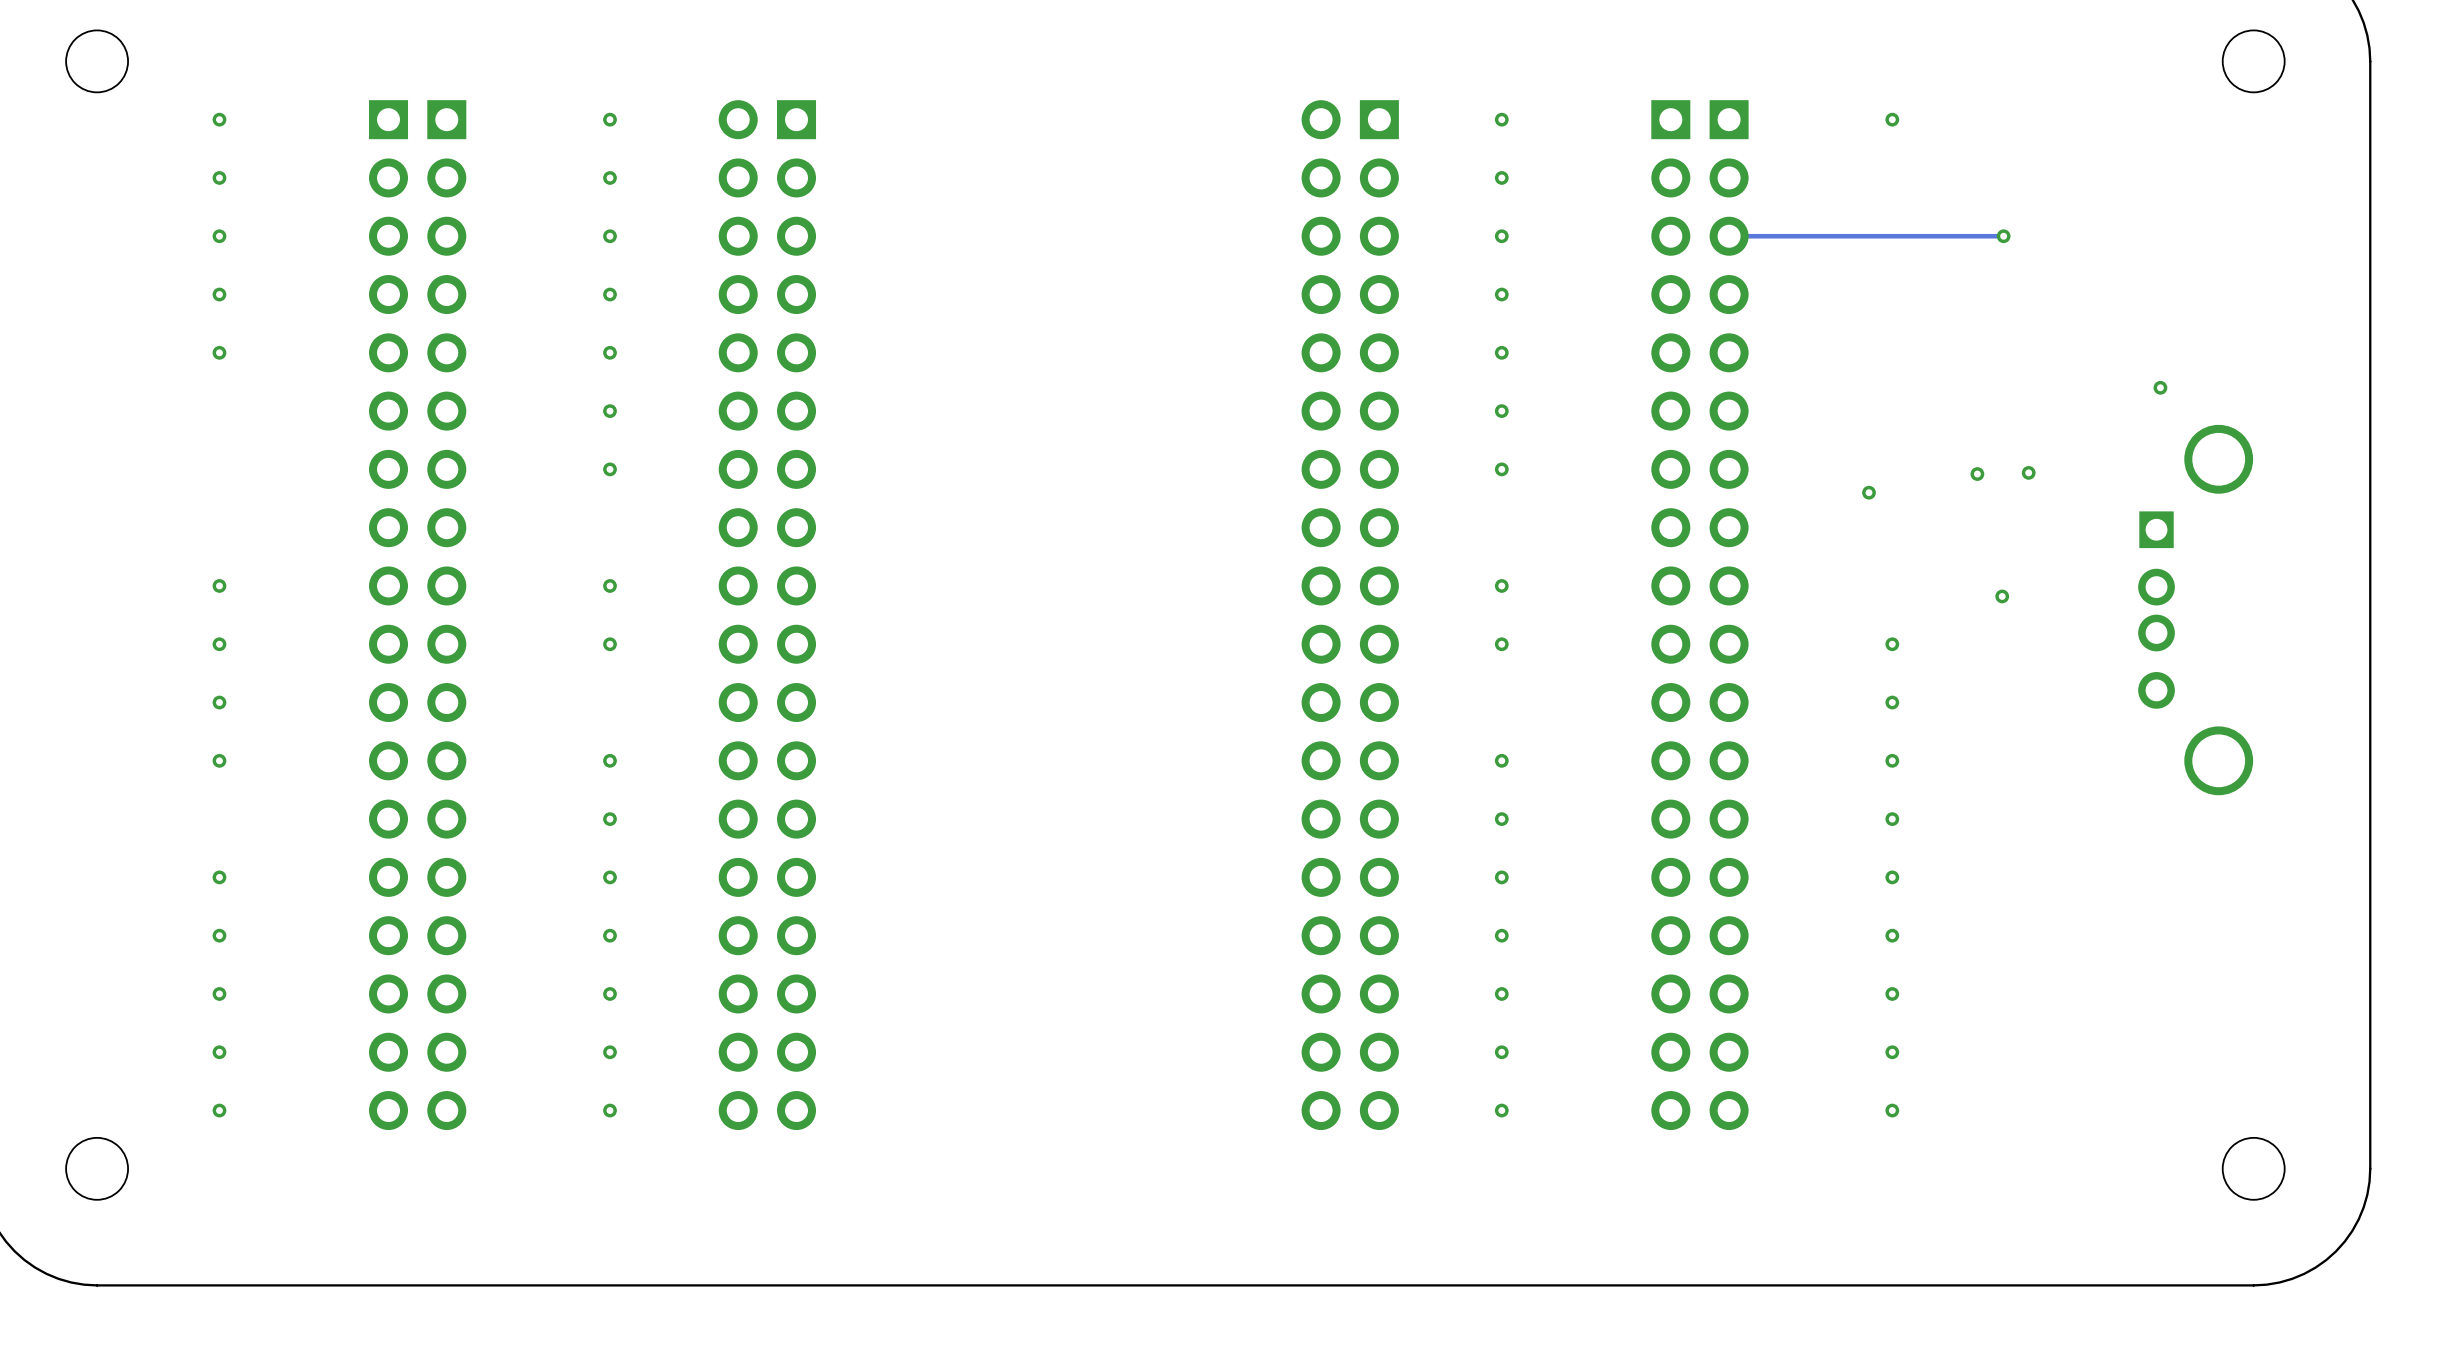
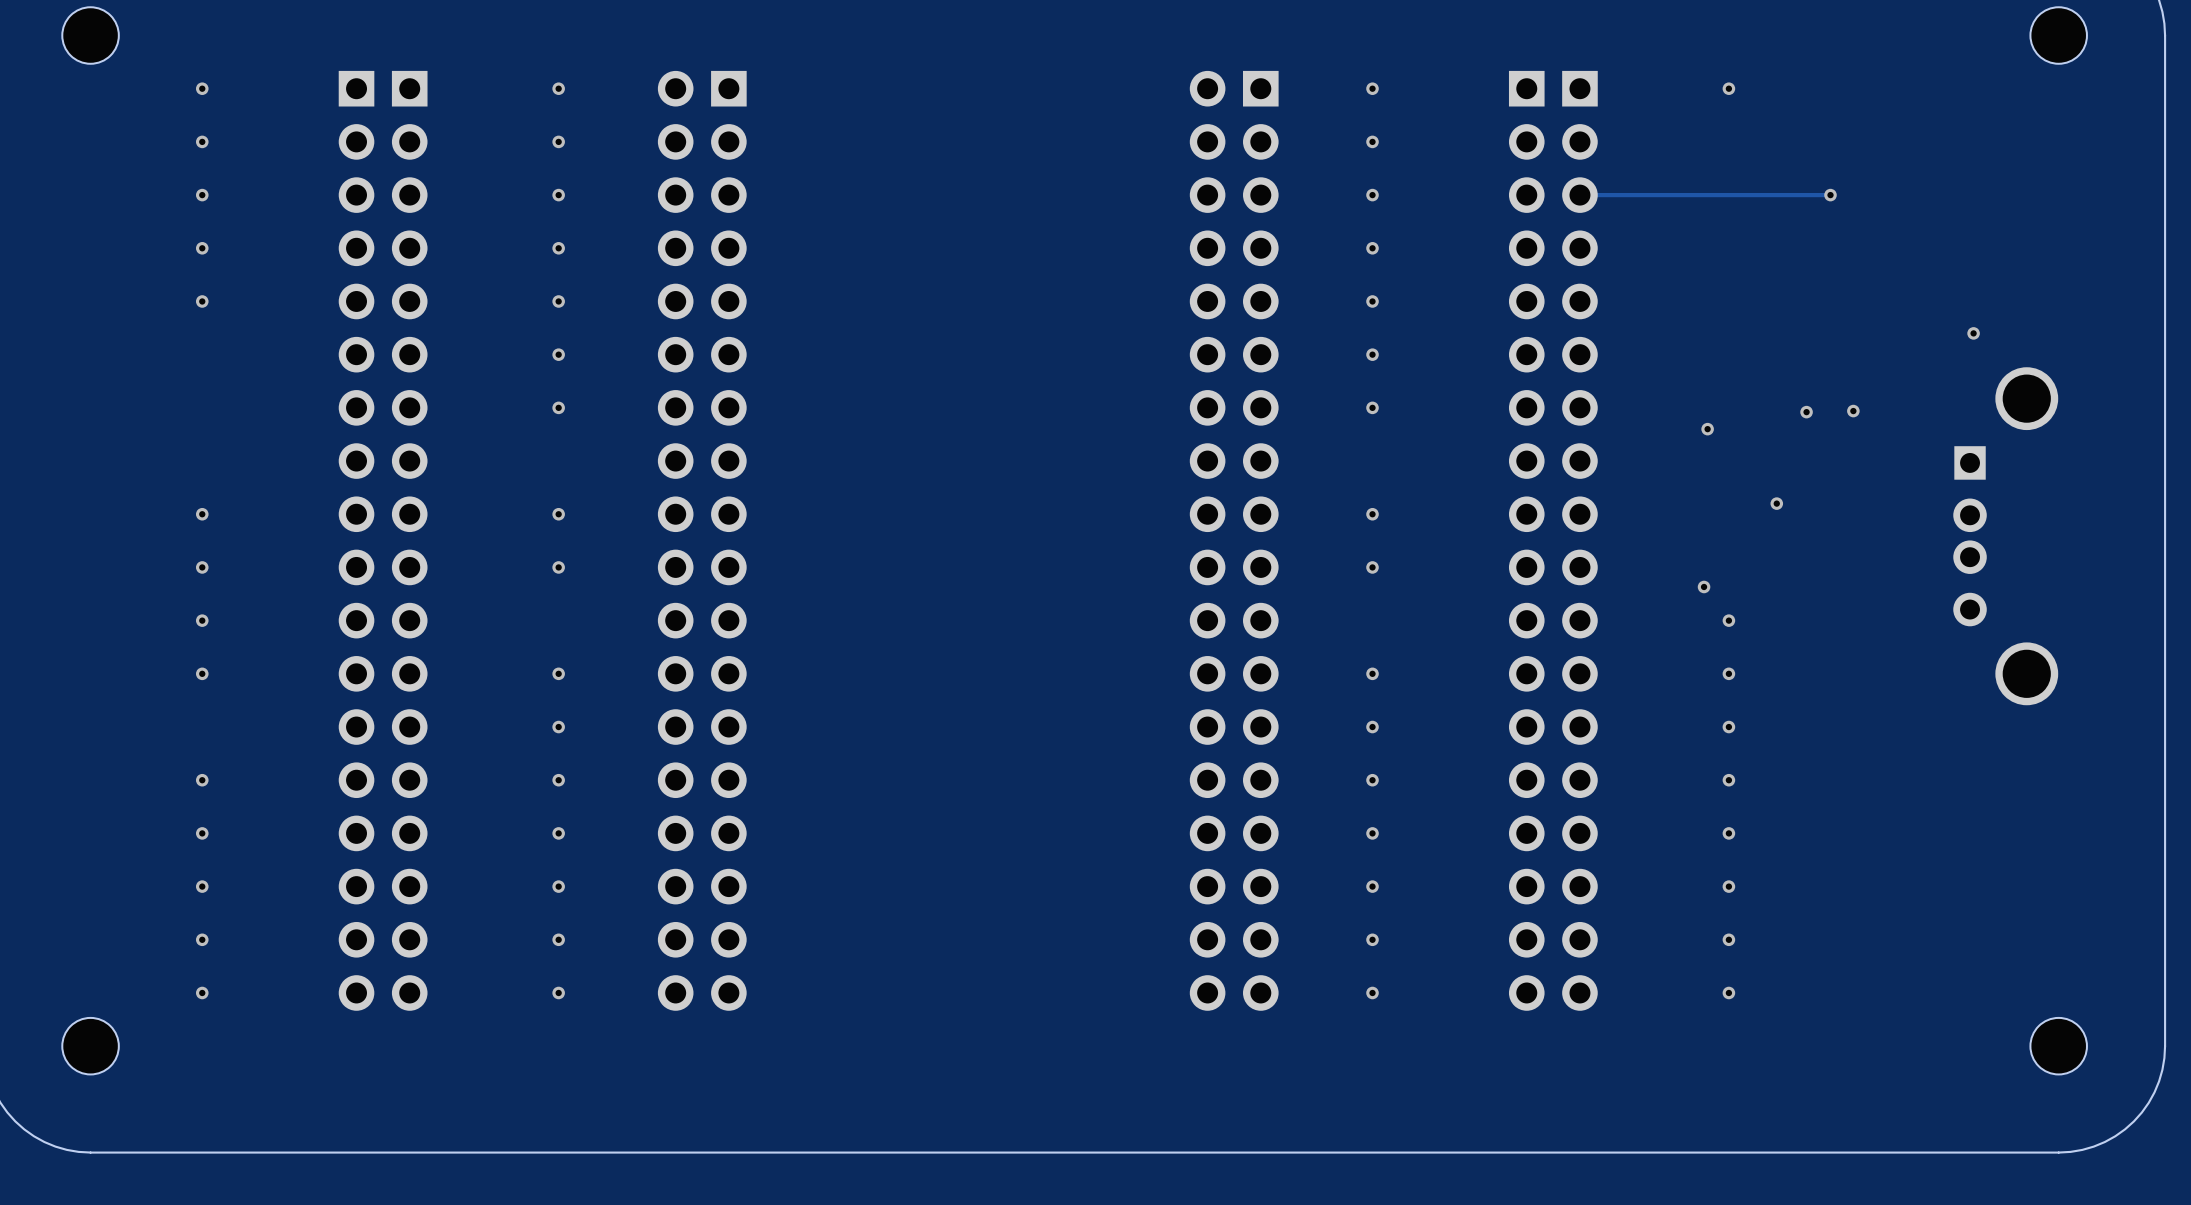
via: none -> (1776, 503)
via: (2002, 596) -> none
via position: (1892, 644) -> (1704, 586)

